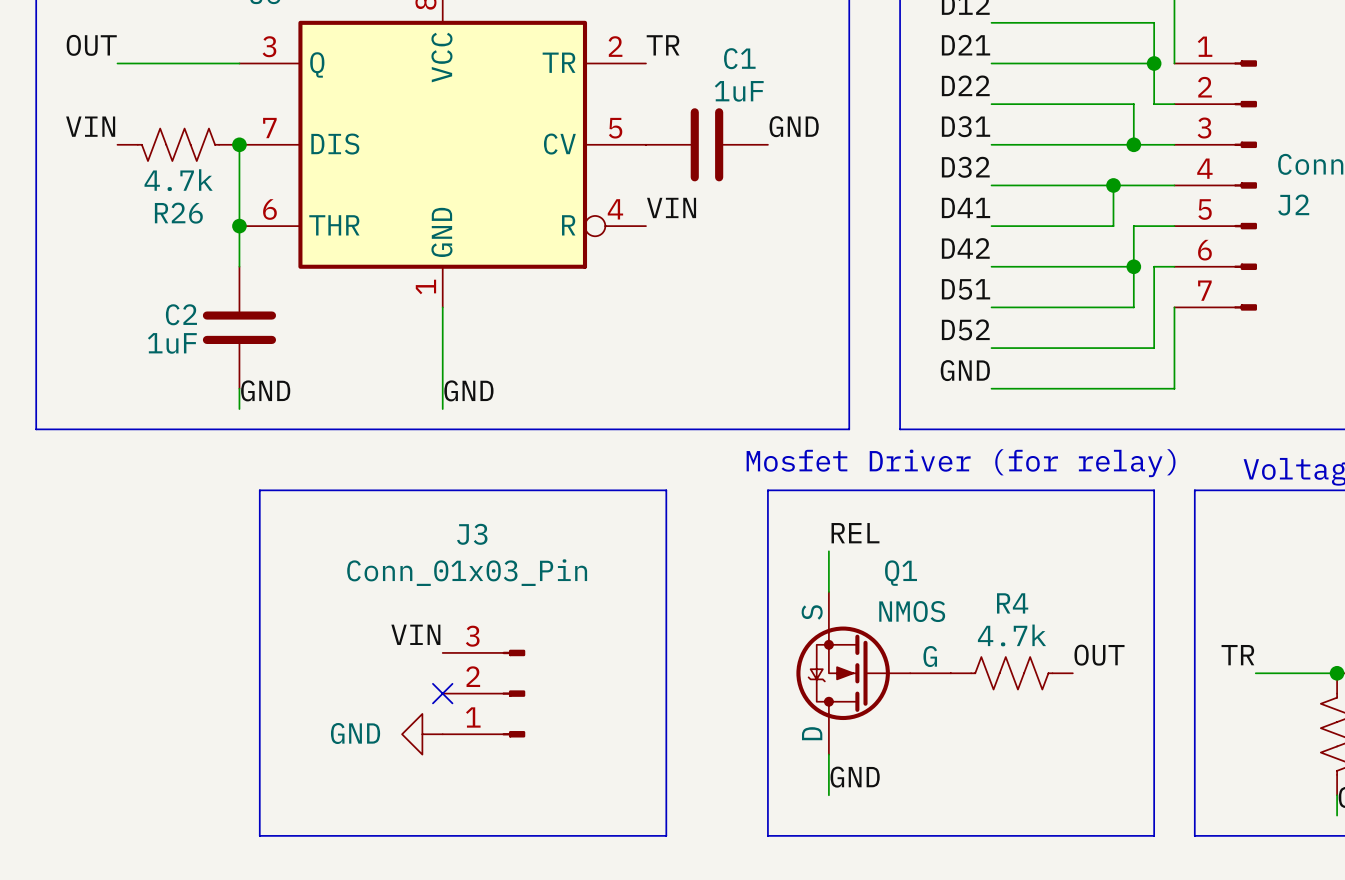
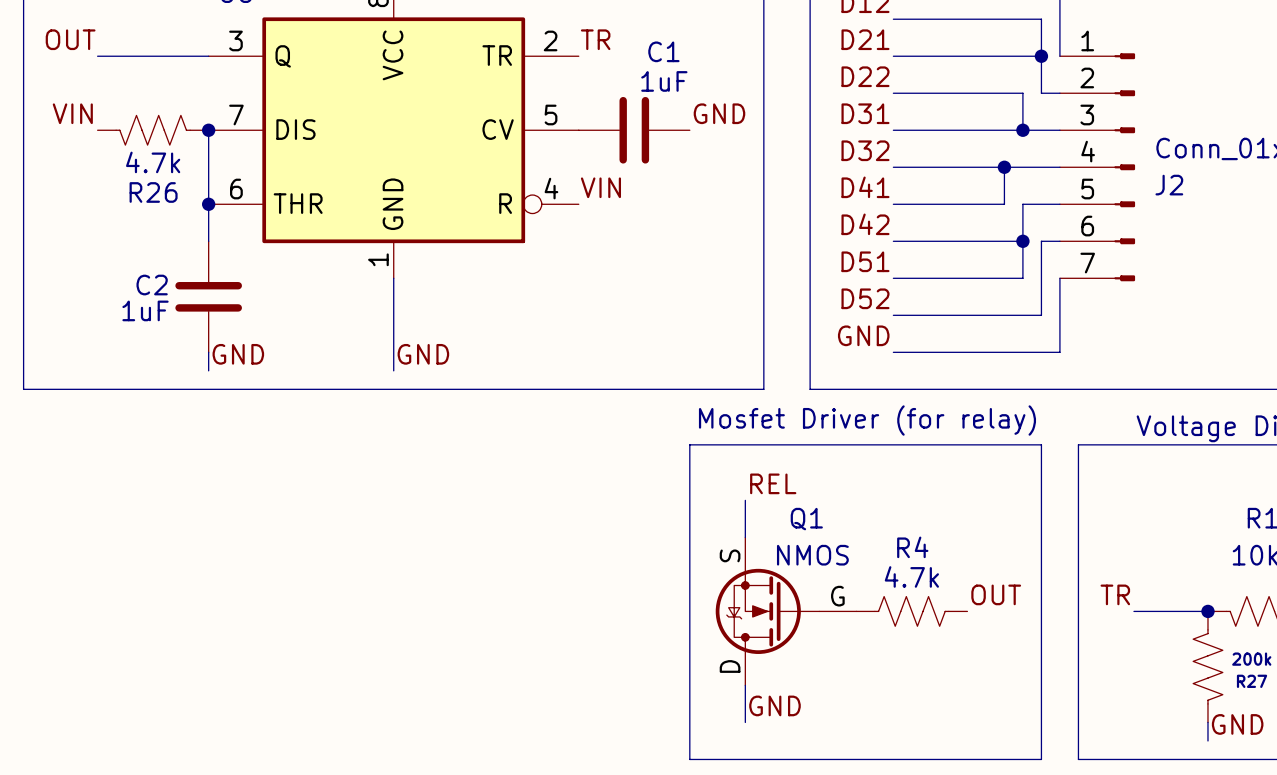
line: (259, 490) (666, 490) (666, 835) (259, 835) (259, 490) -> none
label: VIN (415, 634) -> none
no-connect mark: (442, 693) -> none
J3: Conn_01x03_Pin (483, 693) -> none
power symbol: GND (422, 734) -> none

